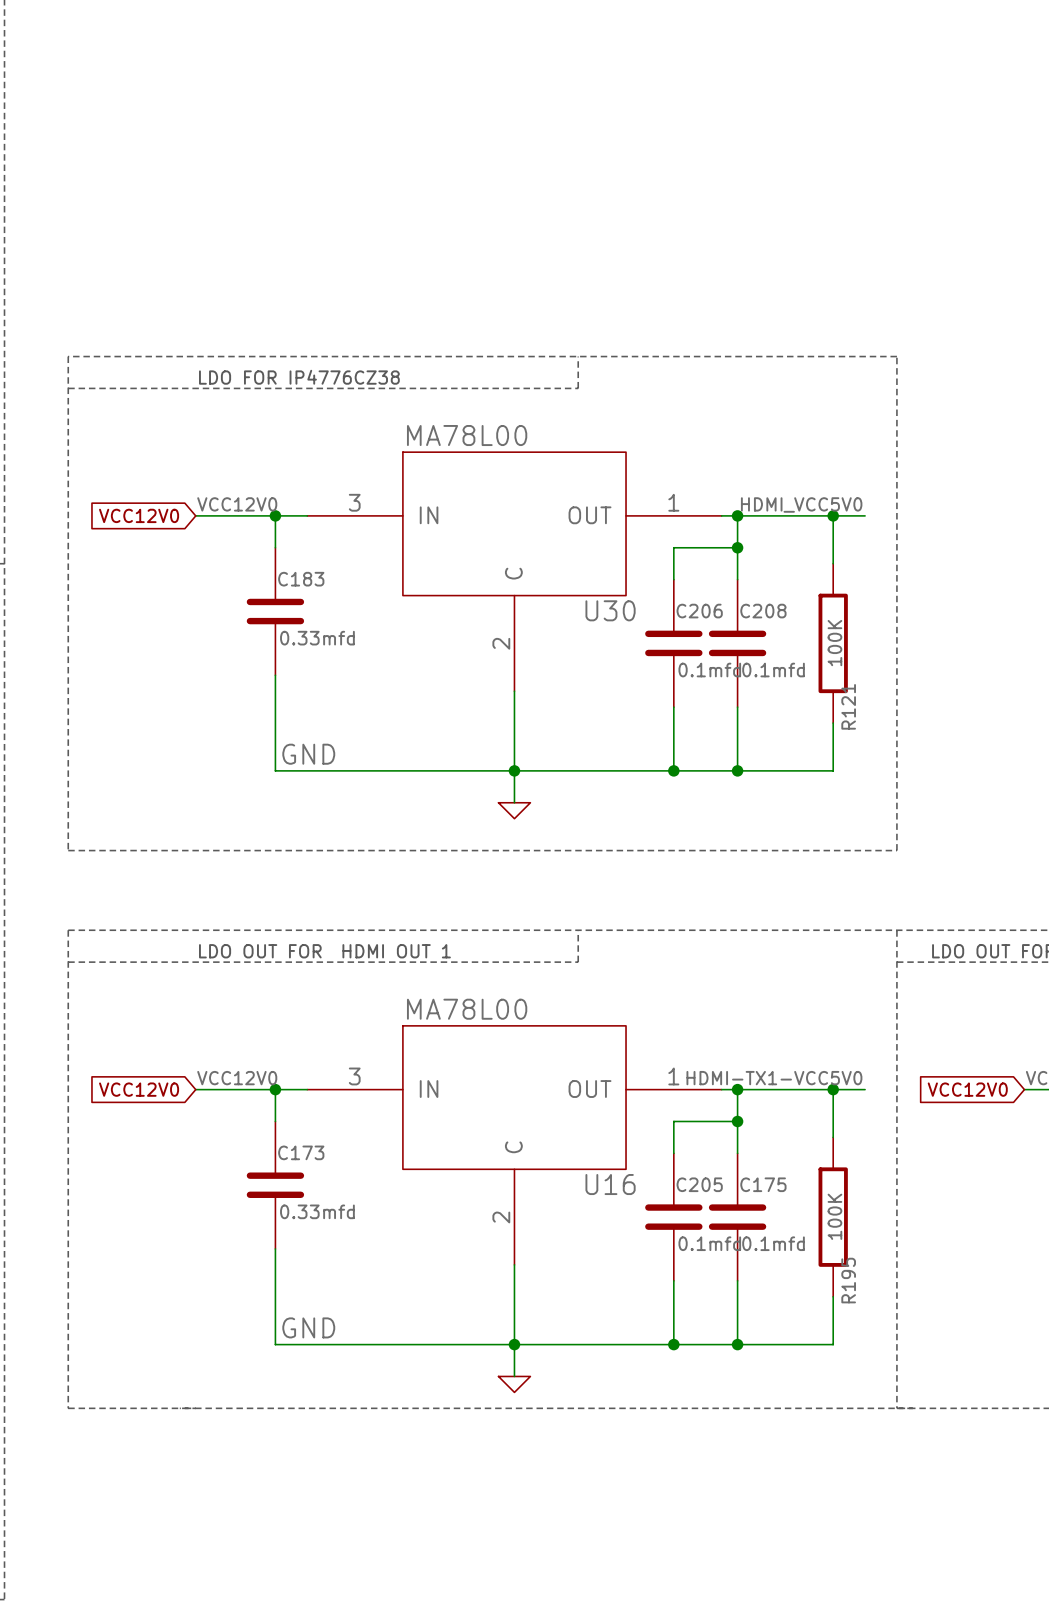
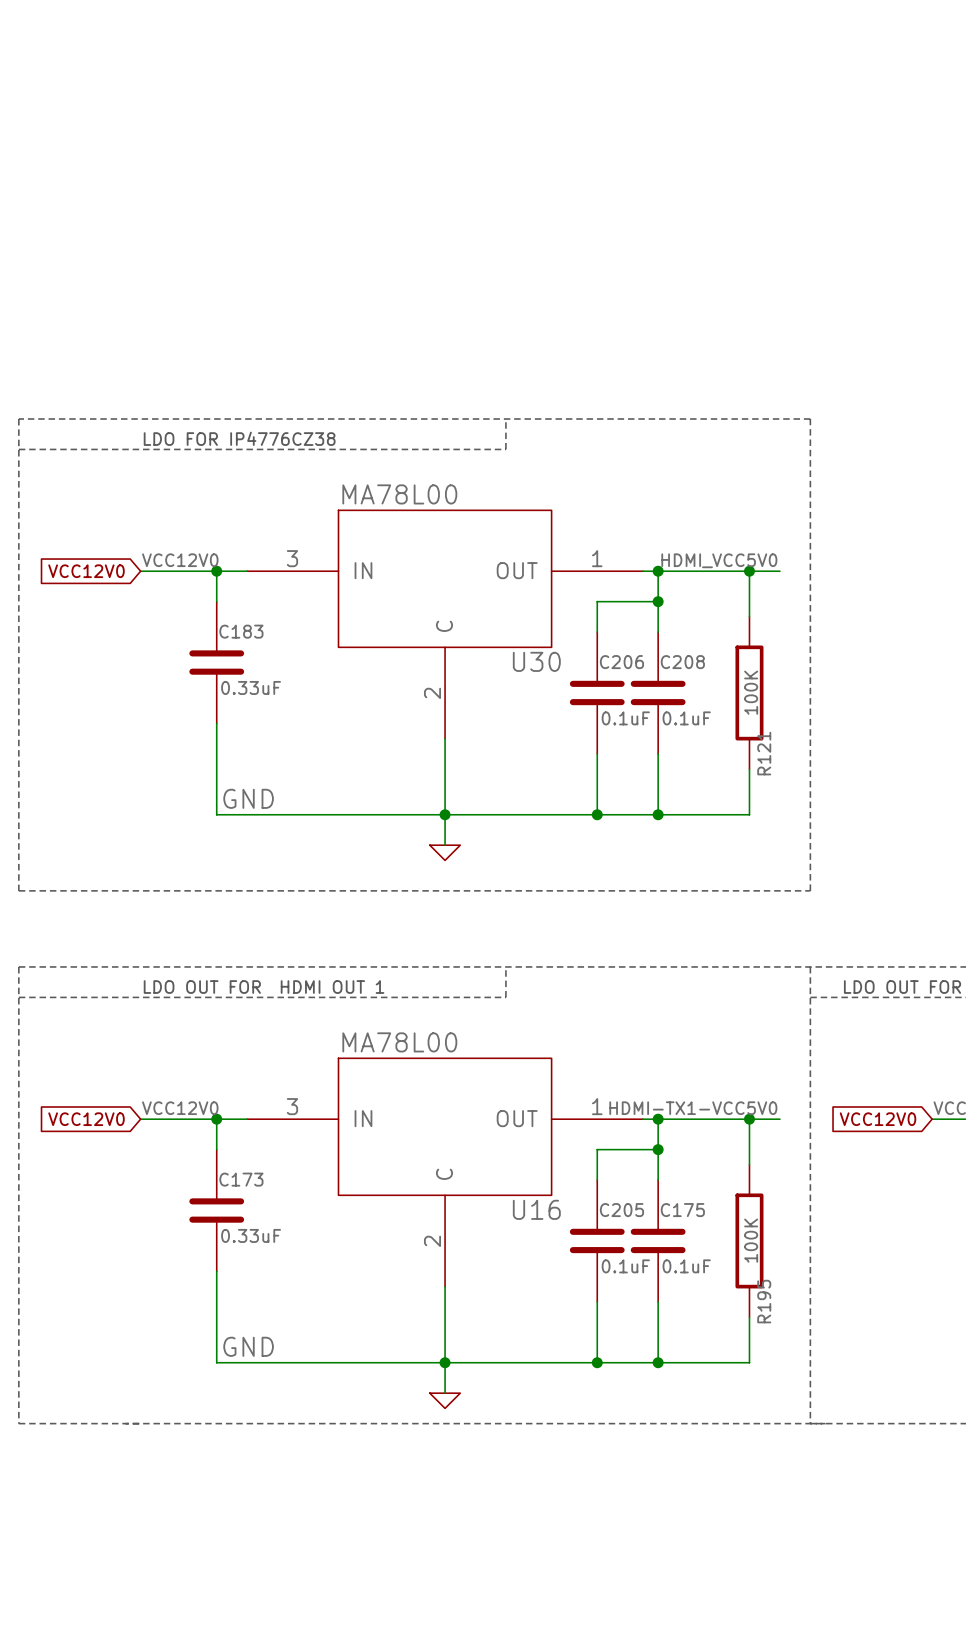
C183 value: 0.33mfd (317, 638) -> 0.33uF (251, 687)
C206 value: 0.1mfd (709, 670) -> 0.1uF (625, 718)
C208 value: 0.1mfd (773, 670) -> 0.1uF (686, 718)
C173 value: 0.33mfd (317, 1211) -> 0.33uF (251, 1235)
C205 value: 0.1mfd (709, 1243) -> 0.1uF (625, 1266)
C175 value: 0.1mfd (773, 1243) -> 0.1uF (686, 1266)

